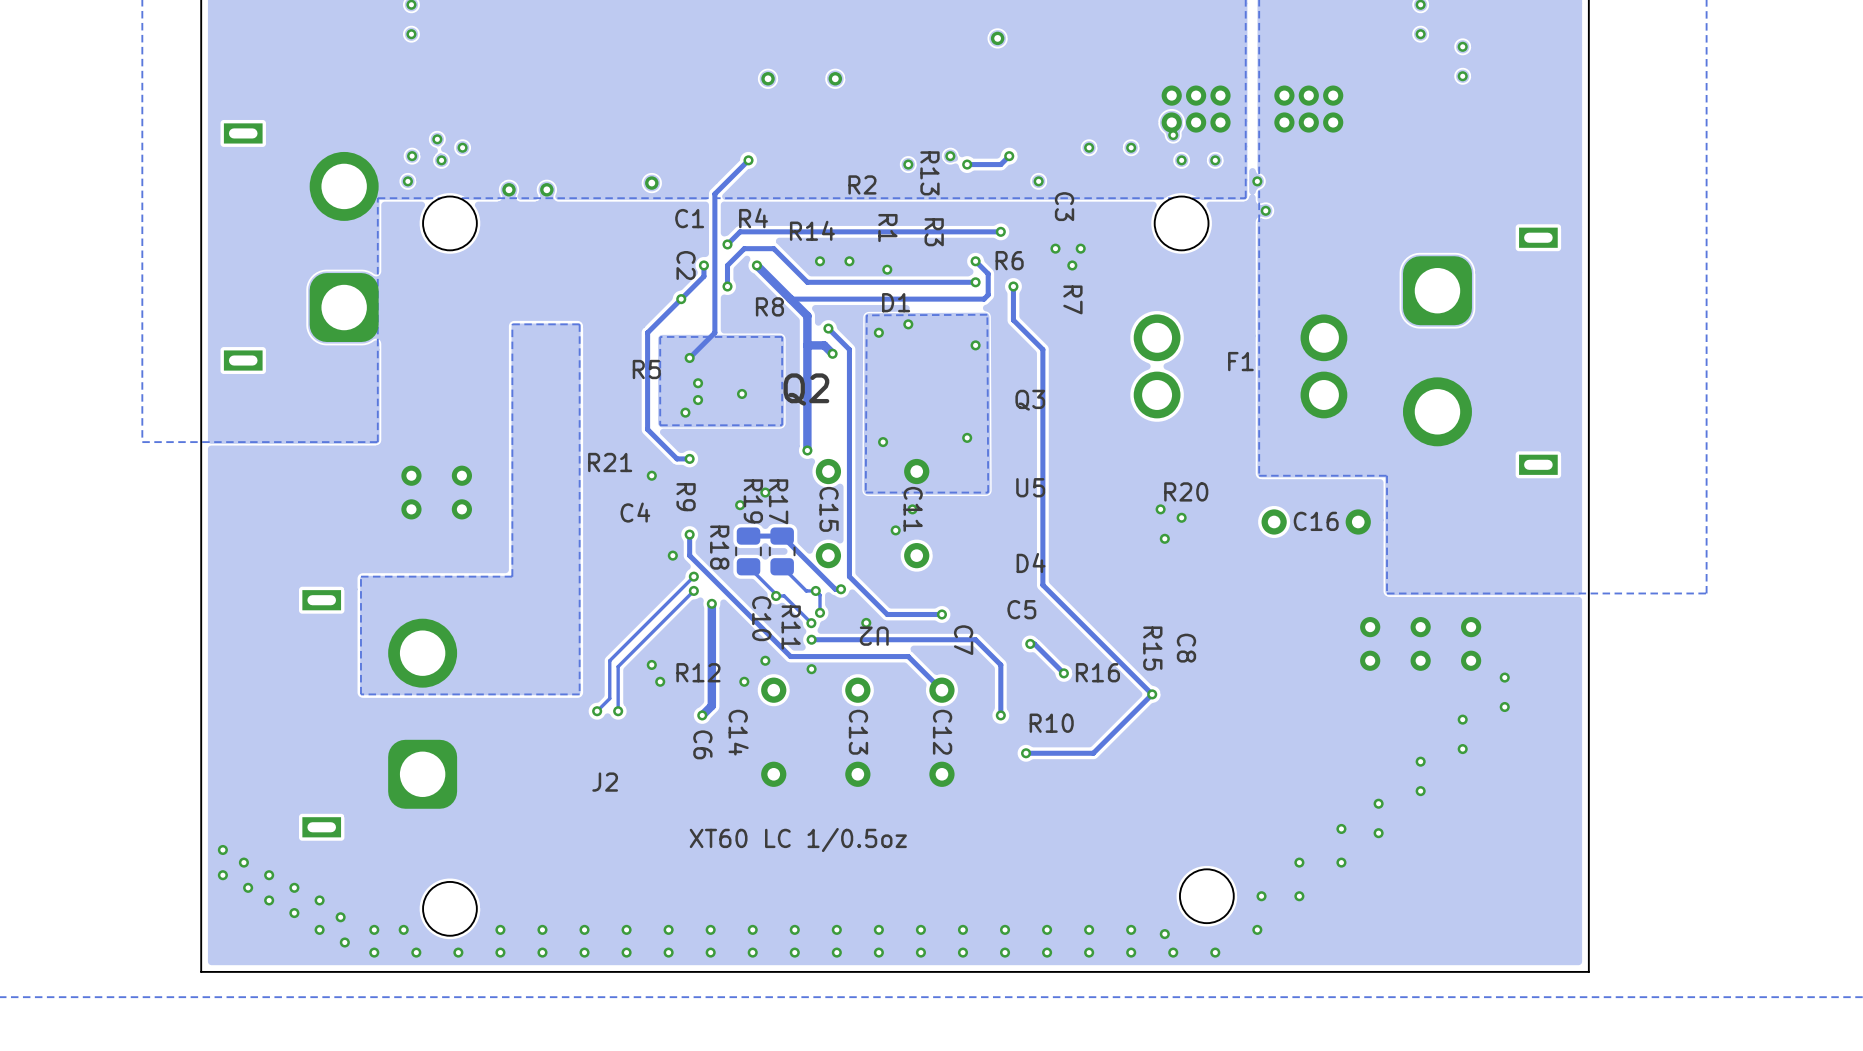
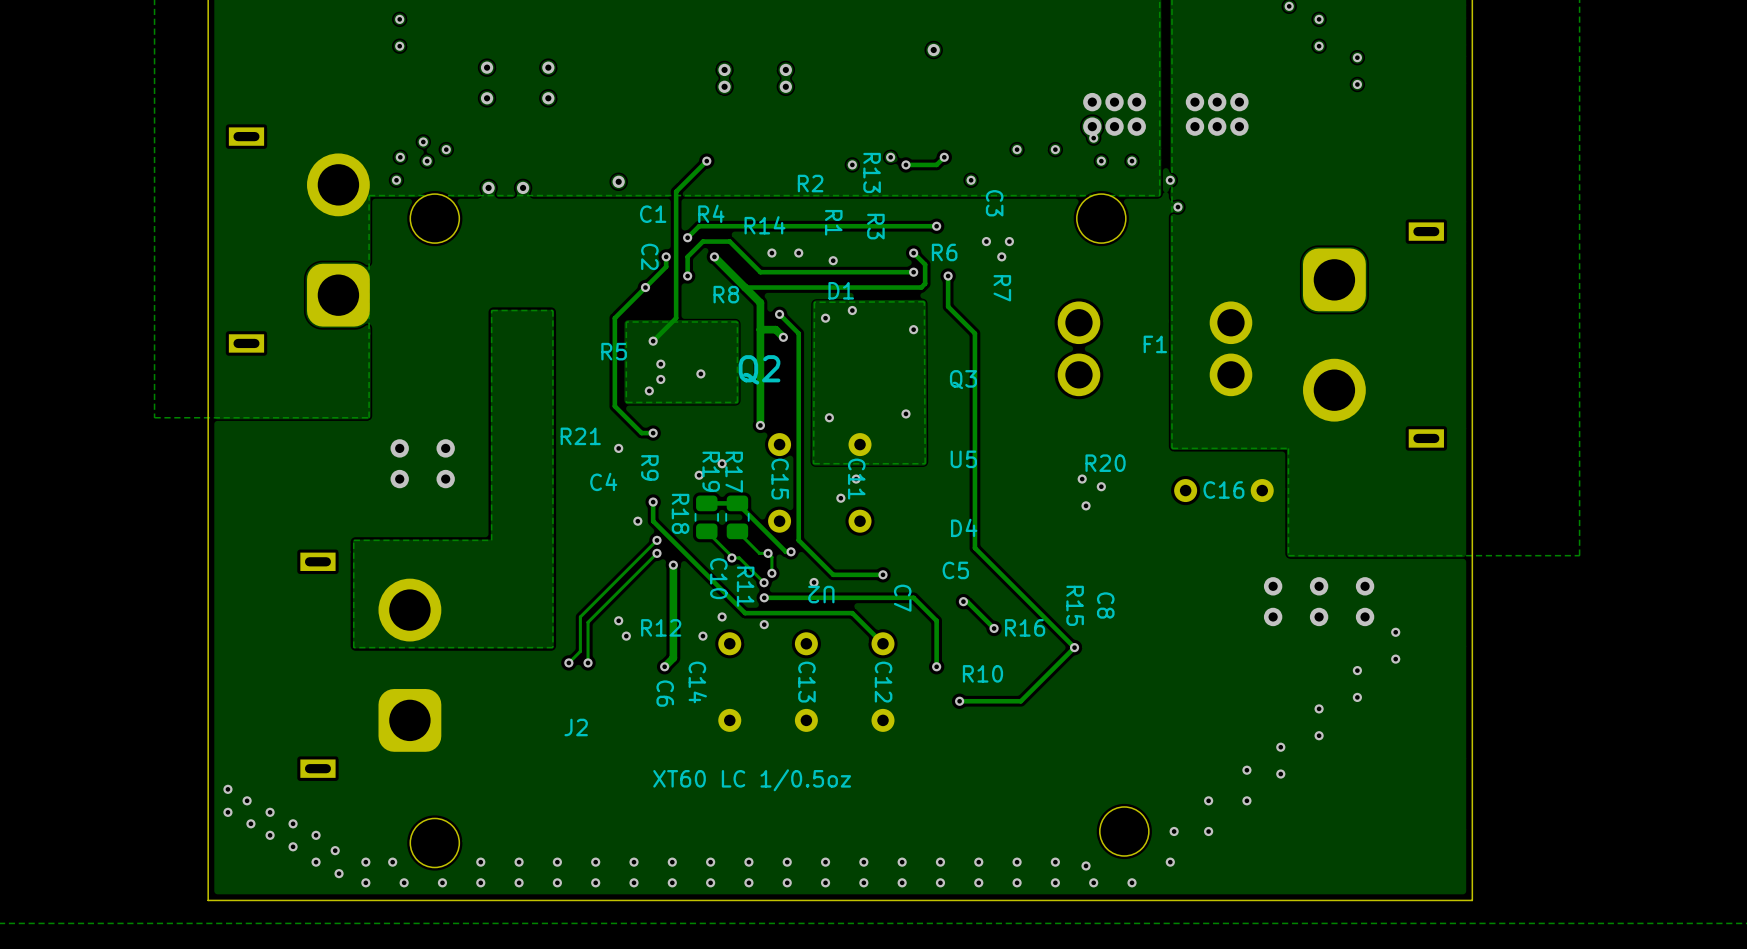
via: none -> (487, 67)
via: none -> (548, 67)
via: none -> (724, 69)
via: none -> (785, 69)
via: none -> (487, 98)
via: none -> (548, 98)

